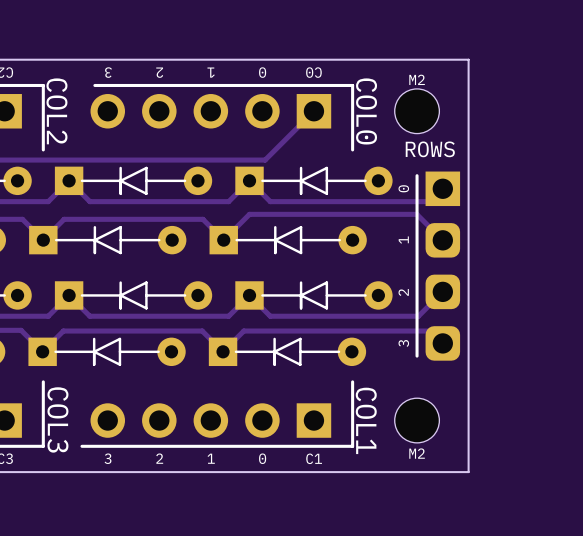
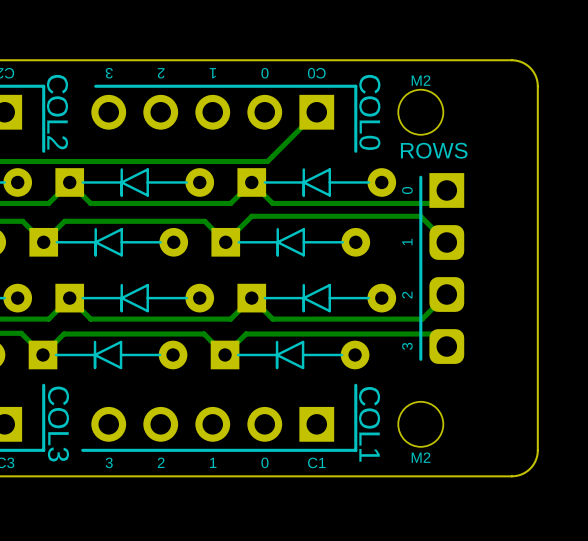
board edge: (468, 59) (468, 472) -> (472, 60) (520, 61) (533, 72) (537, 86) (537, 453) (532, 466) (520, 474) (472, 476)

